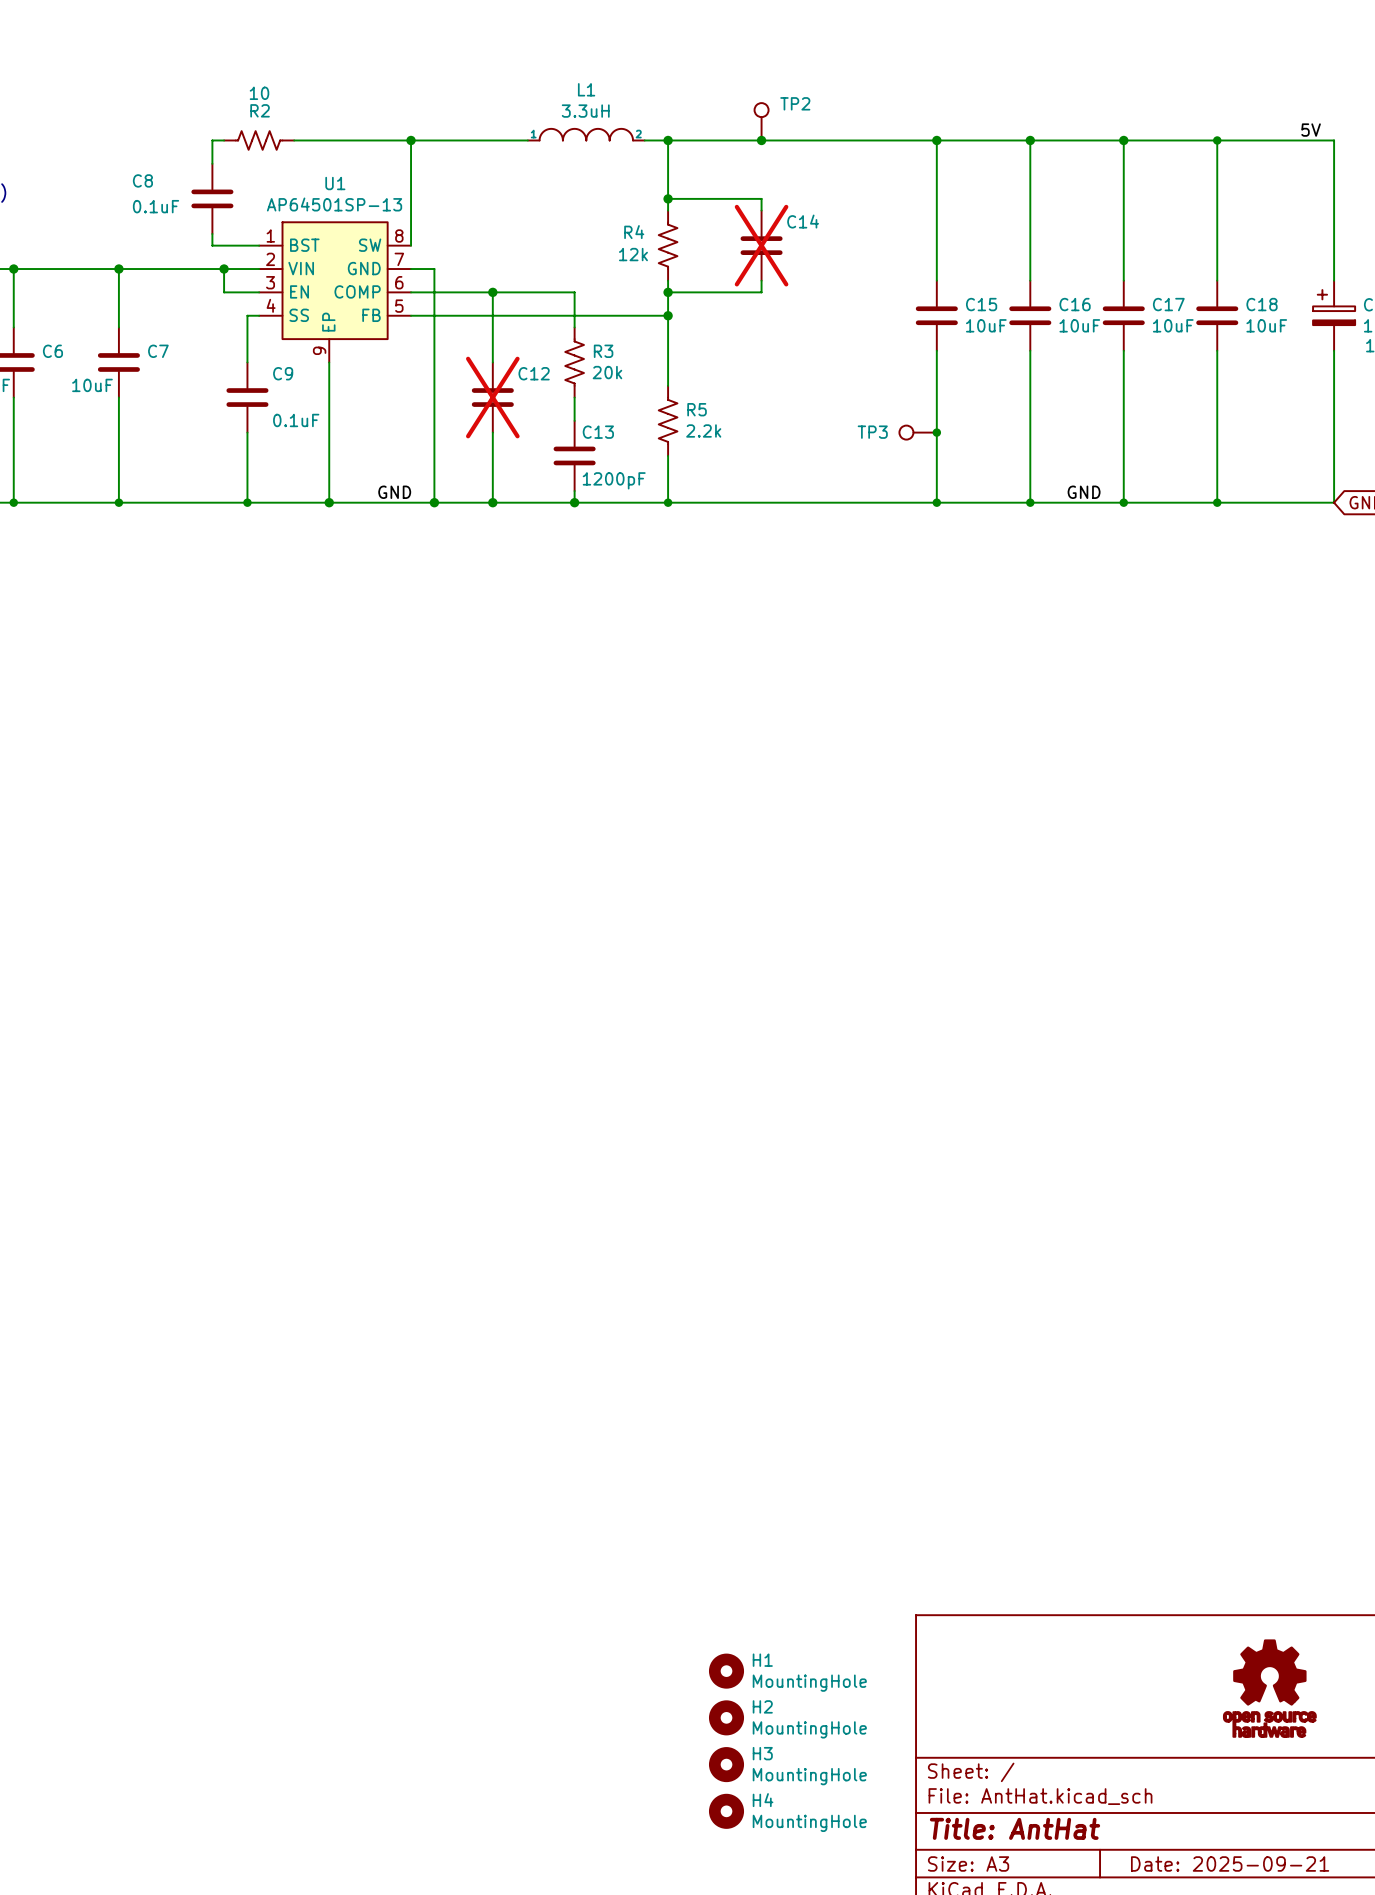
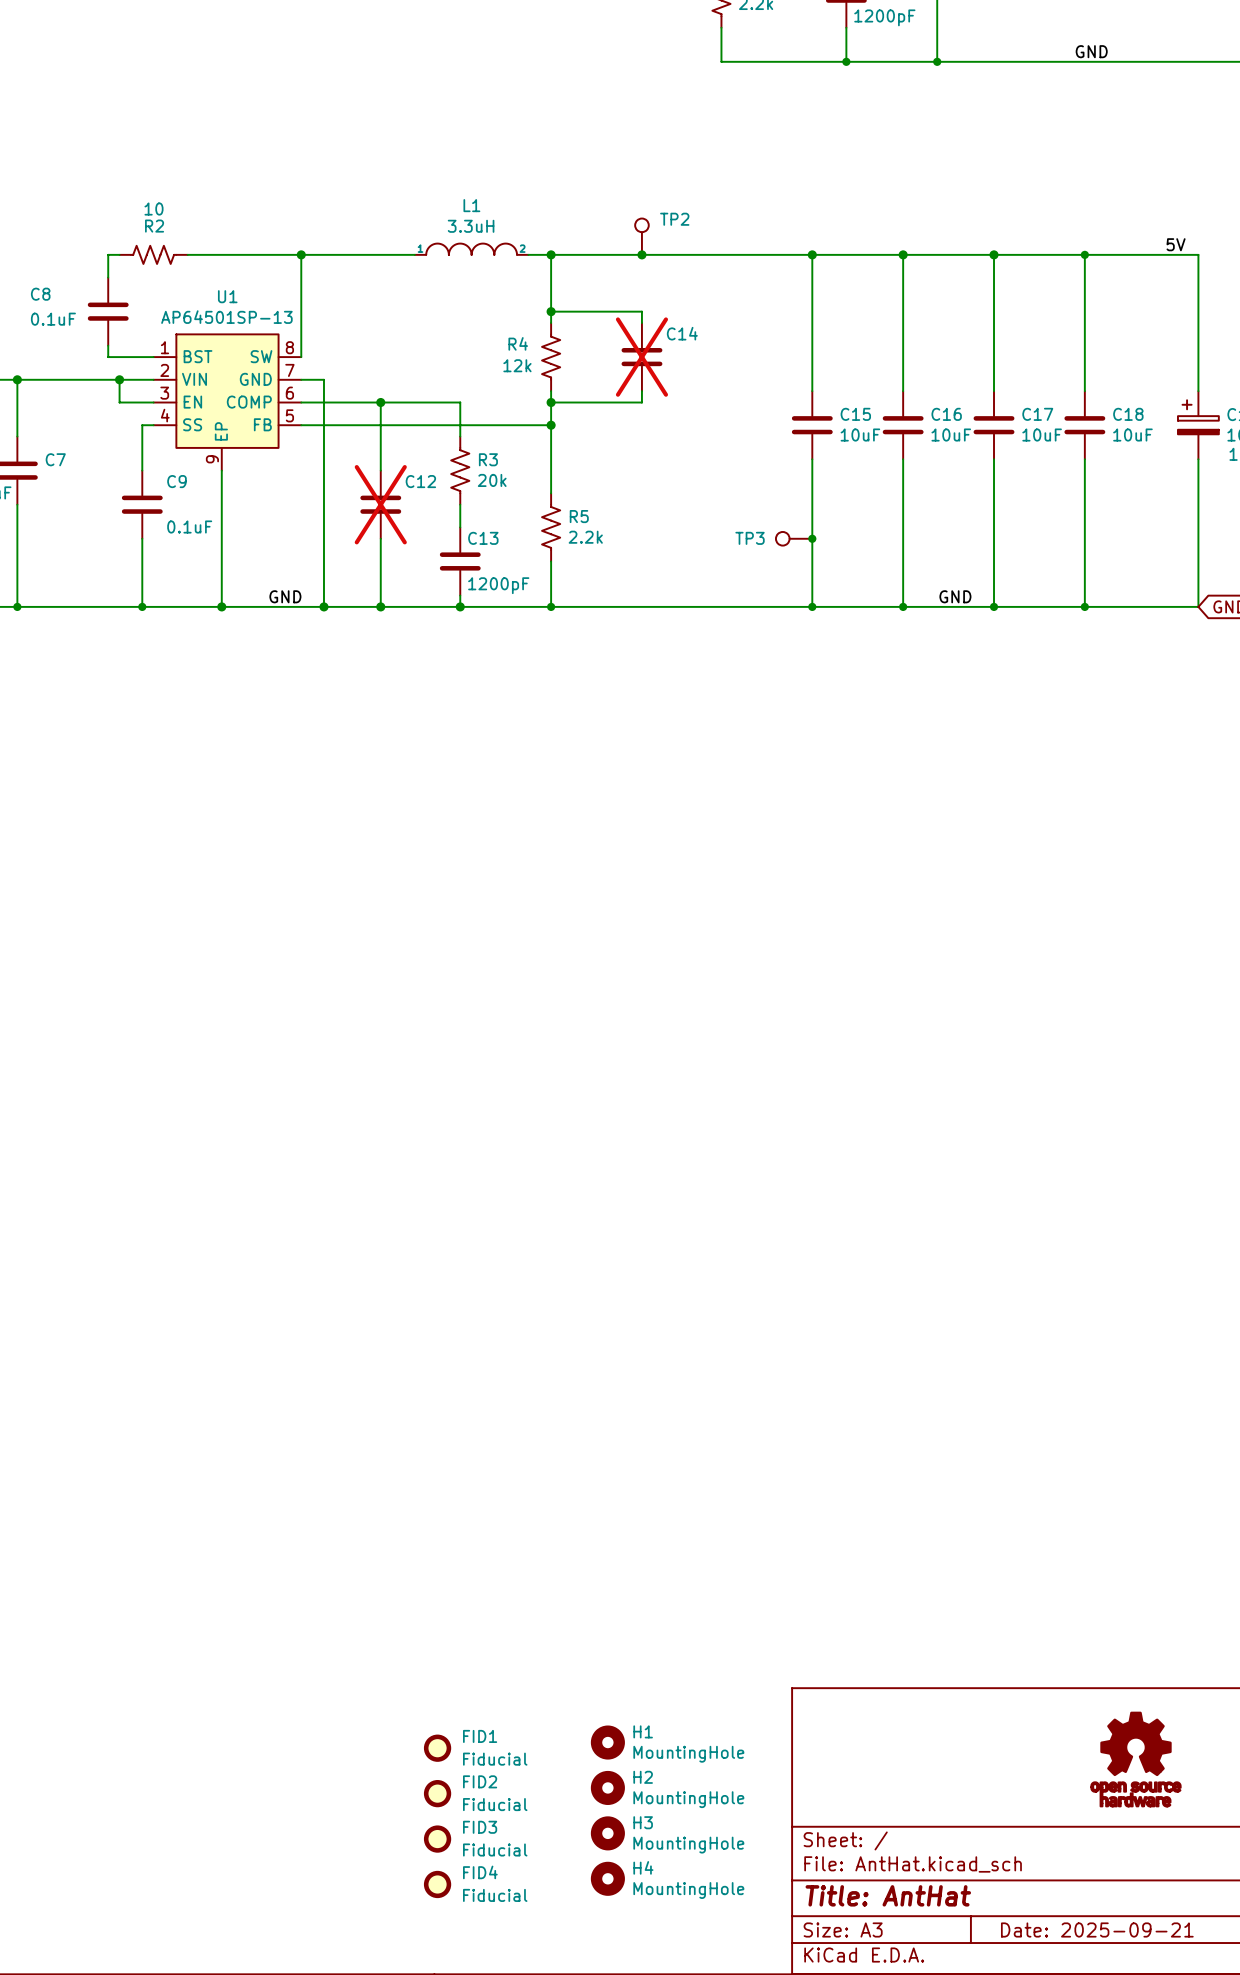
FID1: none -> Fiducial (437, 1748)
FID2: none -> Fiducial (437, 1793)
FID3: none -> Fiducial (437, 1839)
FID4: none -> Fiducial (437, 1884)

